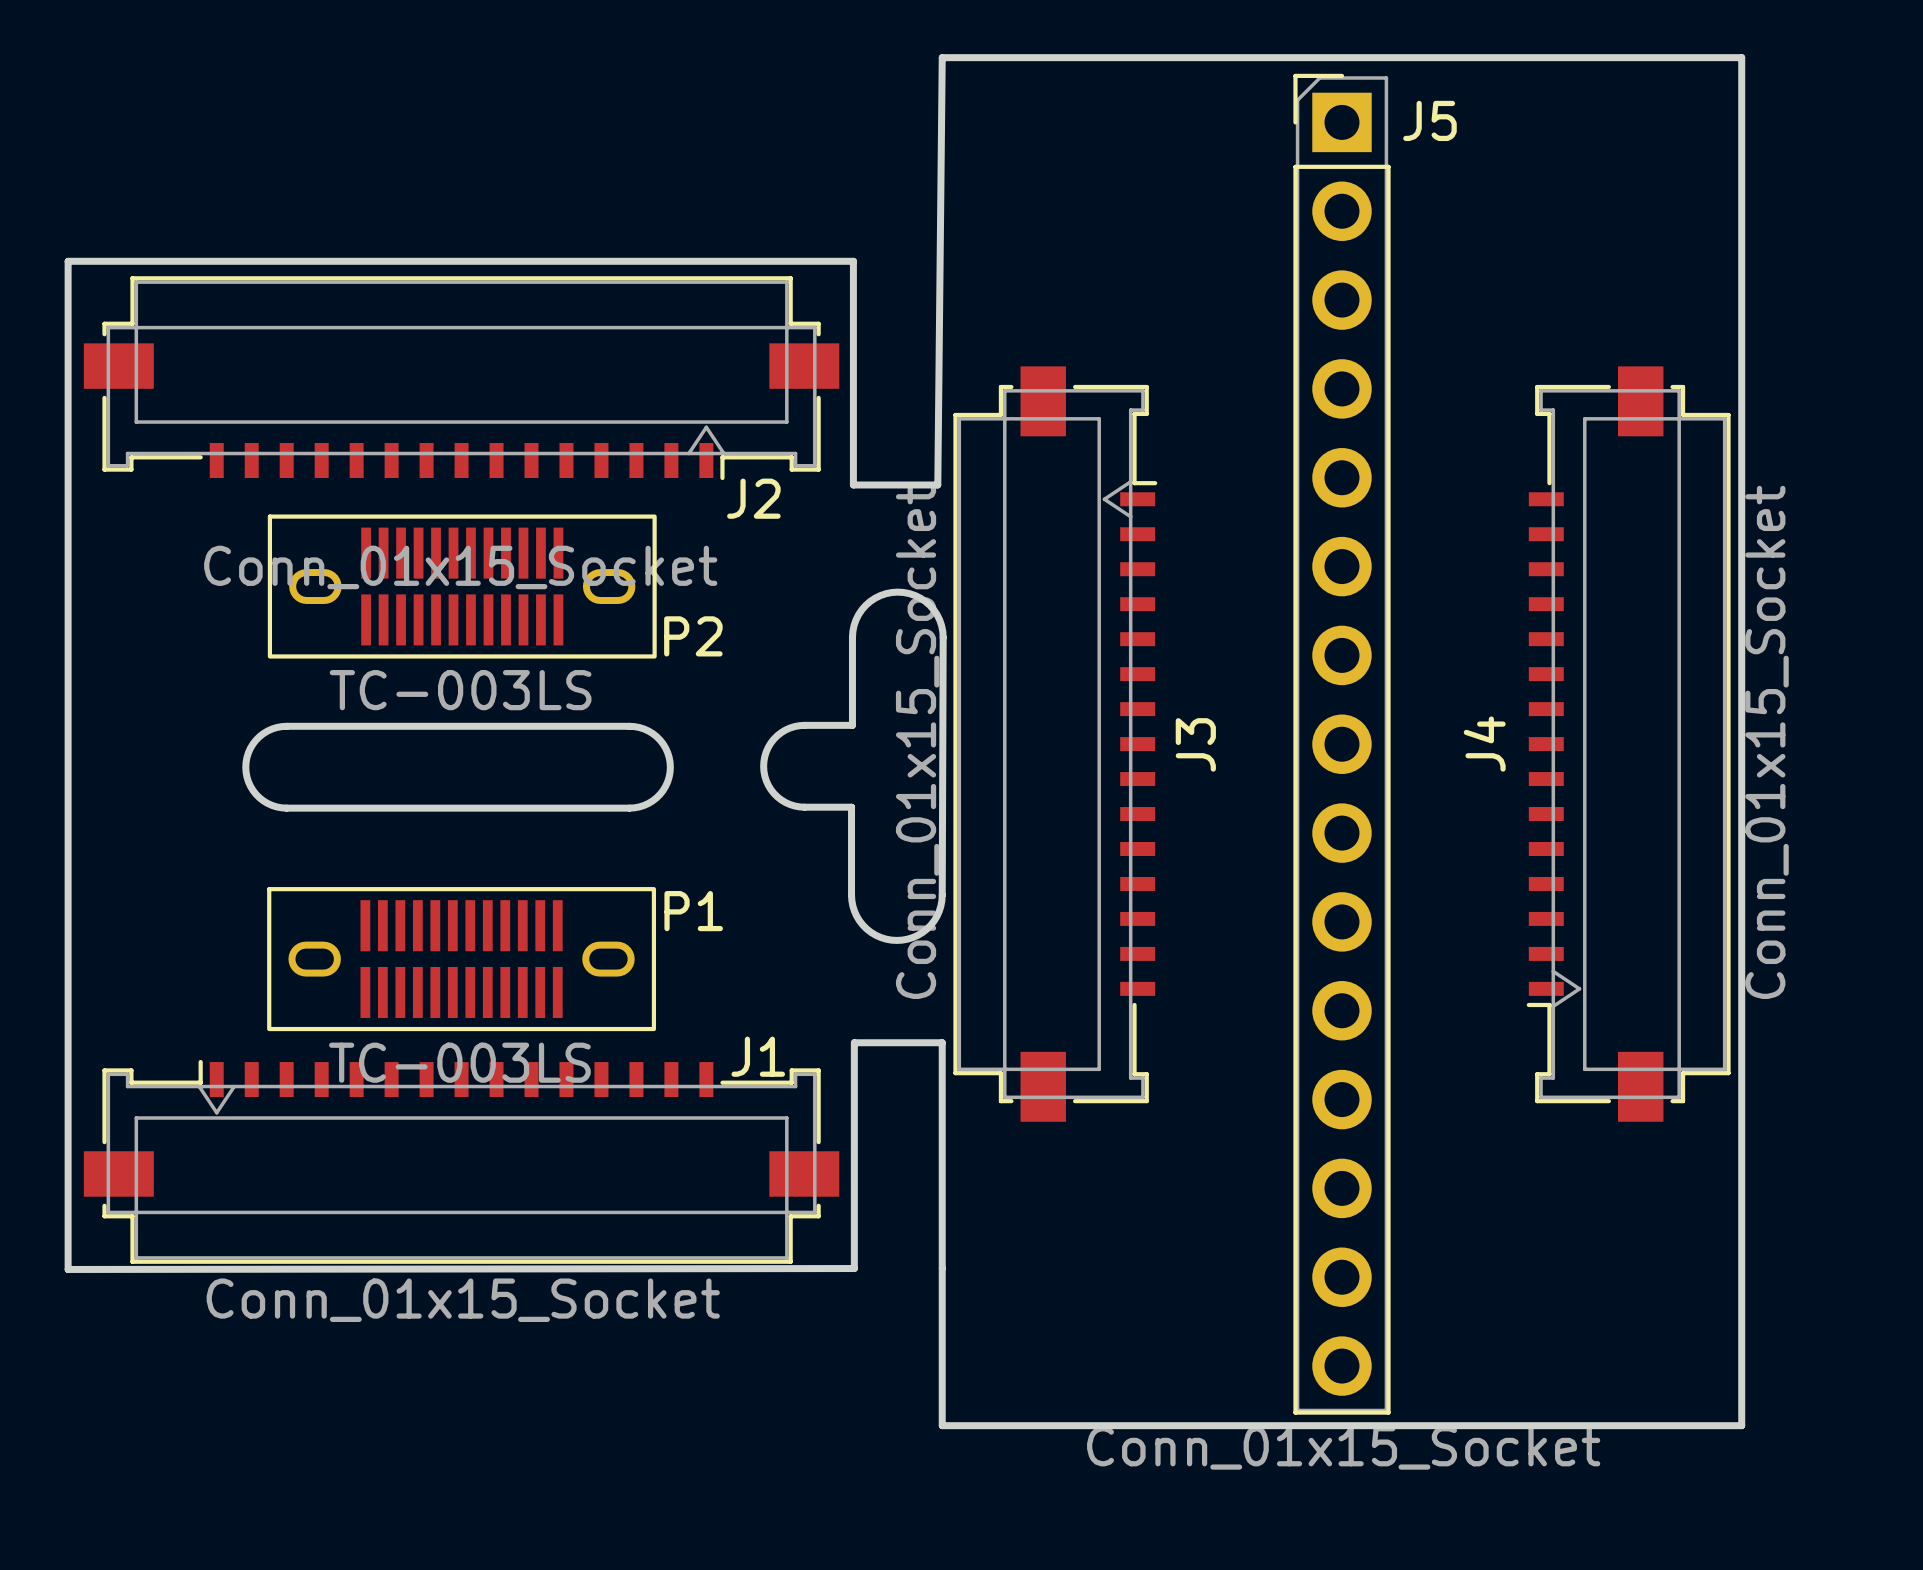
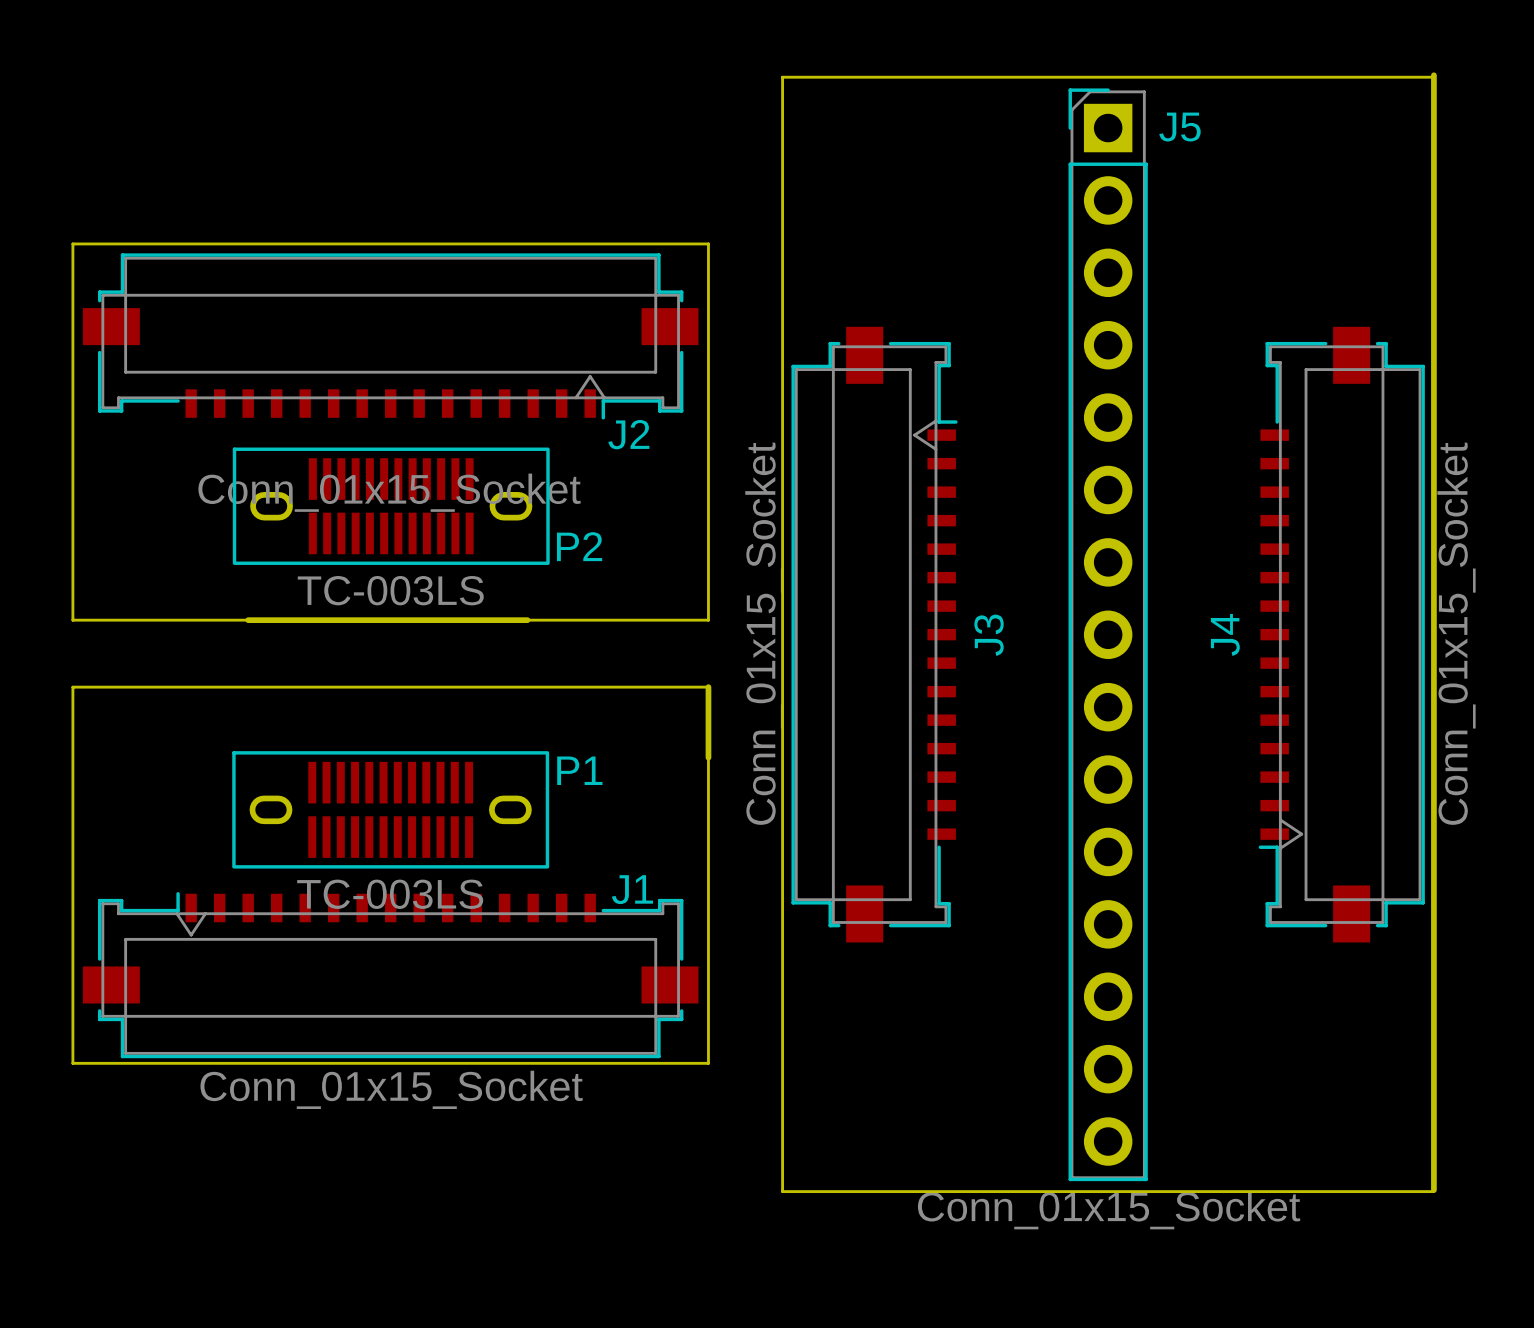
board edge: (1741, 57) (942, 57) (937, 484) (853, 484) (853, 261) (68, 261) (68, 1269) (854, 1268) (854, 1042) (942, 1042) (942, 1425) (1741, 1425) -> none
board edge: none -> (1433, 77) (782, 77) (782, 1191) (1433, 1191)
board edge: (804, 725) (852, 725) (852, 631) (858, 614) (865, 605) (880, 595) (897, 592) (915, 595) (929, 605) (939, 620) (943, 637) (940, 905) (934, 920) (922, 932) (907, 939) (891, 940) (875, 935) (862, 925) (854, 911) (851, 895) -> (708, 687) (72, 687) (72, 1063) (708, 1063) (708, 757)
board edge: (804, 725) (785, 730) (770, 743) (763, 761) (764, 776) (768, 785) (777, 796) (794, 806) (851, 808) -> none
board edge: (286, 726) (272, 728) (256, 740) (248, 752) (245, 767) (248, 781) (256, 794) (272, 805) (286, 808) (639, 806) (652, 800) (663, 790) (669, 777) (670, 762) (665, 748) (656, 736) (643, 728) (629, 726) -> (248, 620) (72, 620) (72, 243) (708, 243) (708, 620) (527, 620)

